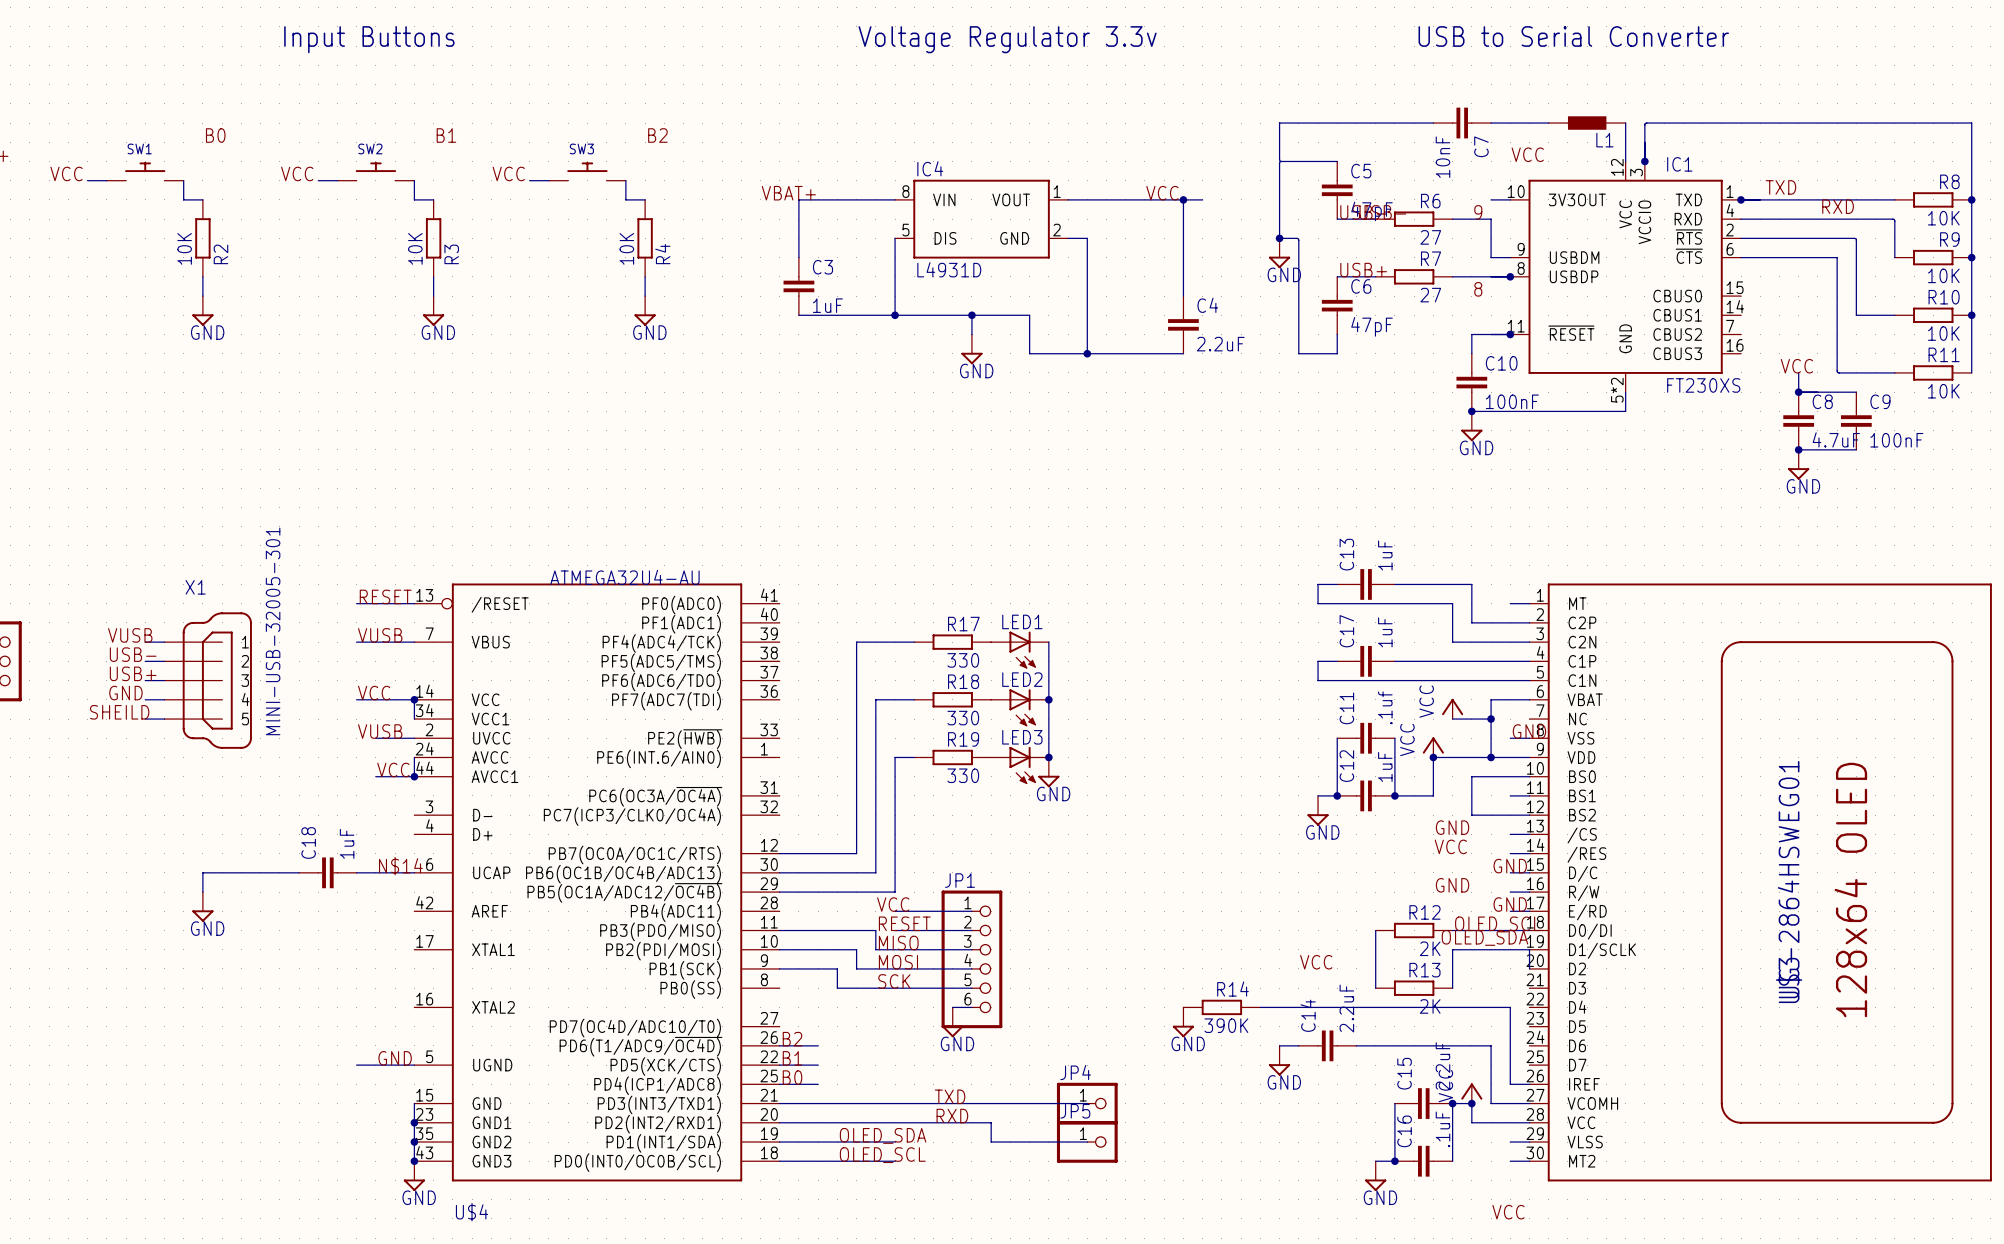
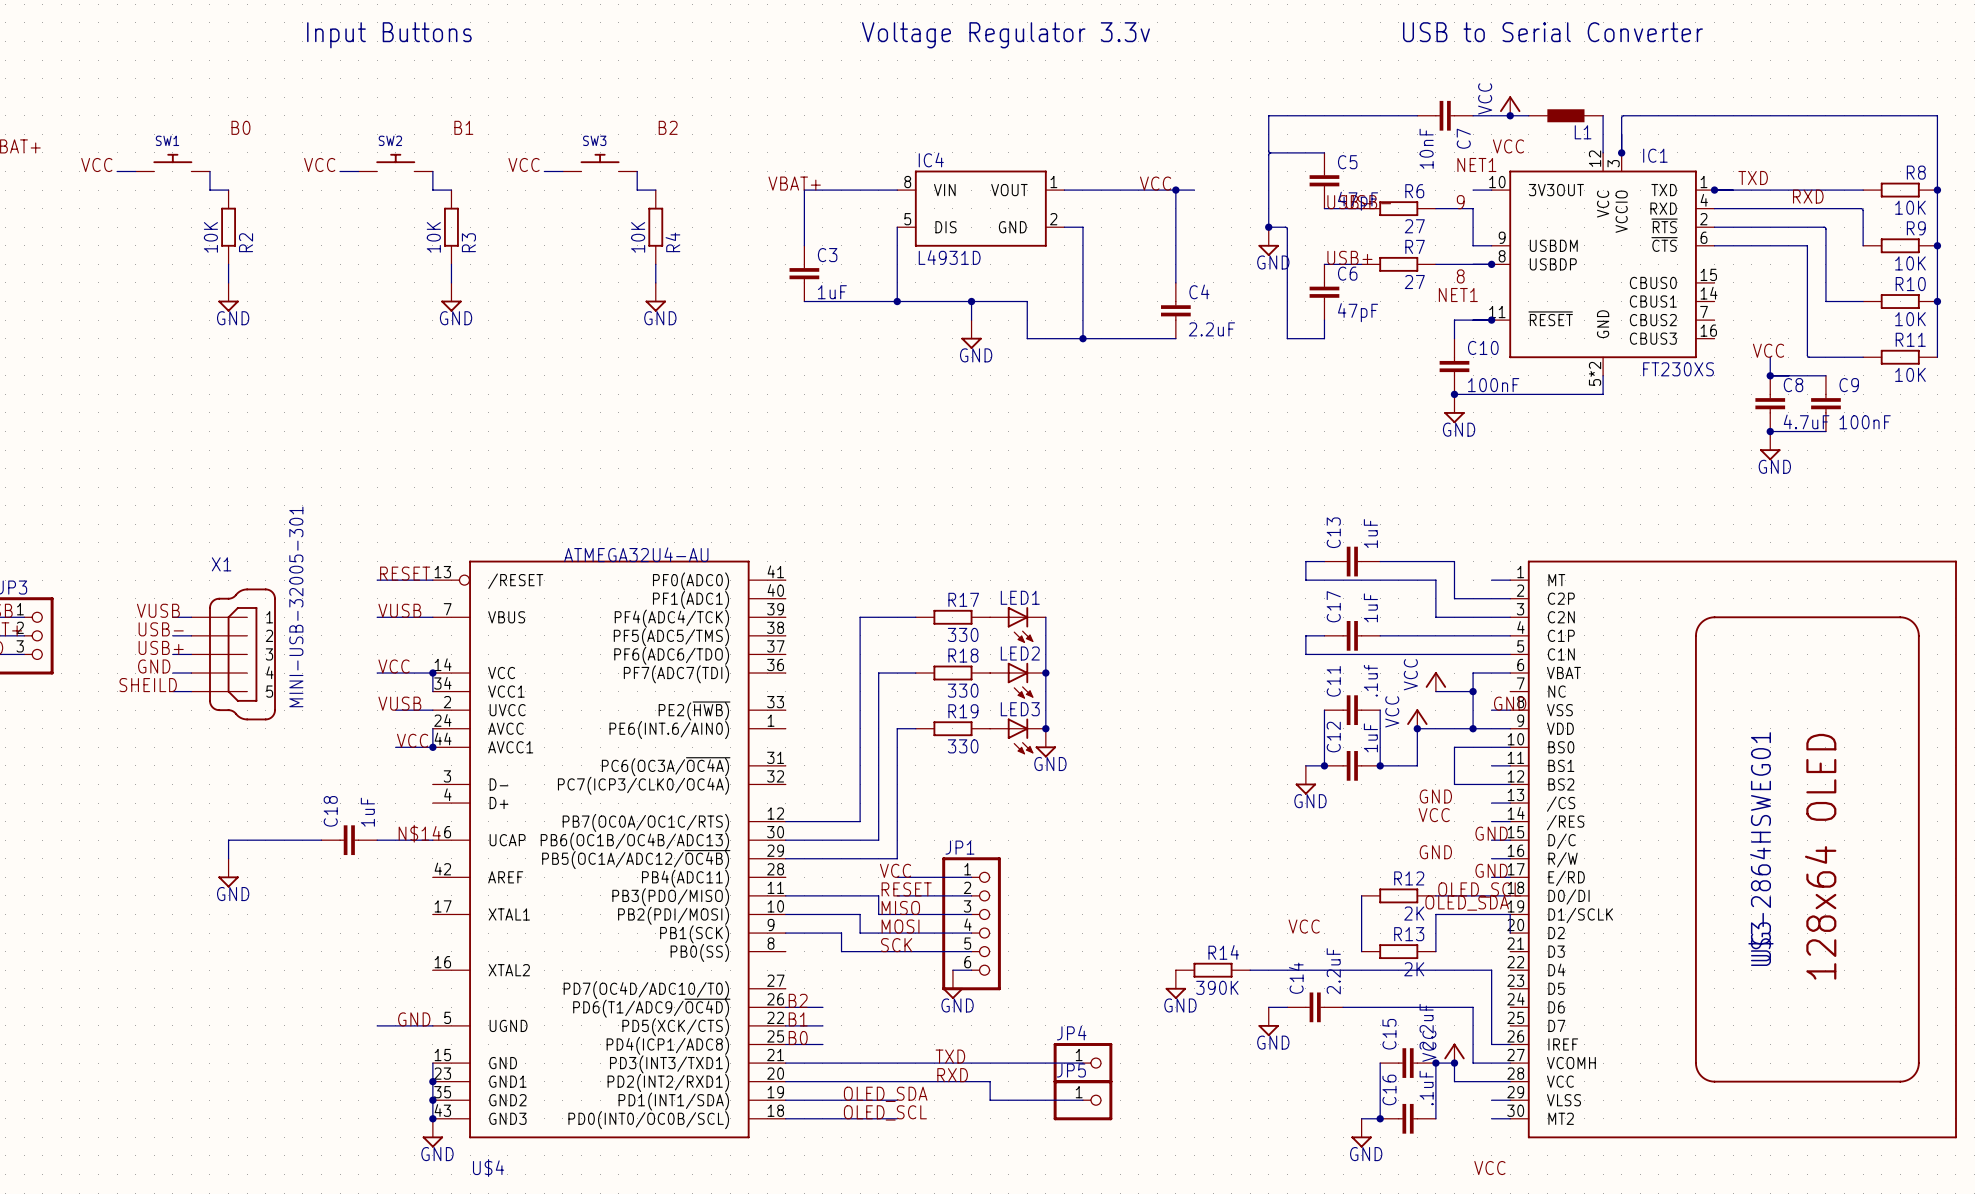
power symbol: none -> VCC (1510, 106)
junction: none -> (1510, 115)
label: none -> NET1 (1476, 164)
label: none -> NET1 (1458, 295)

